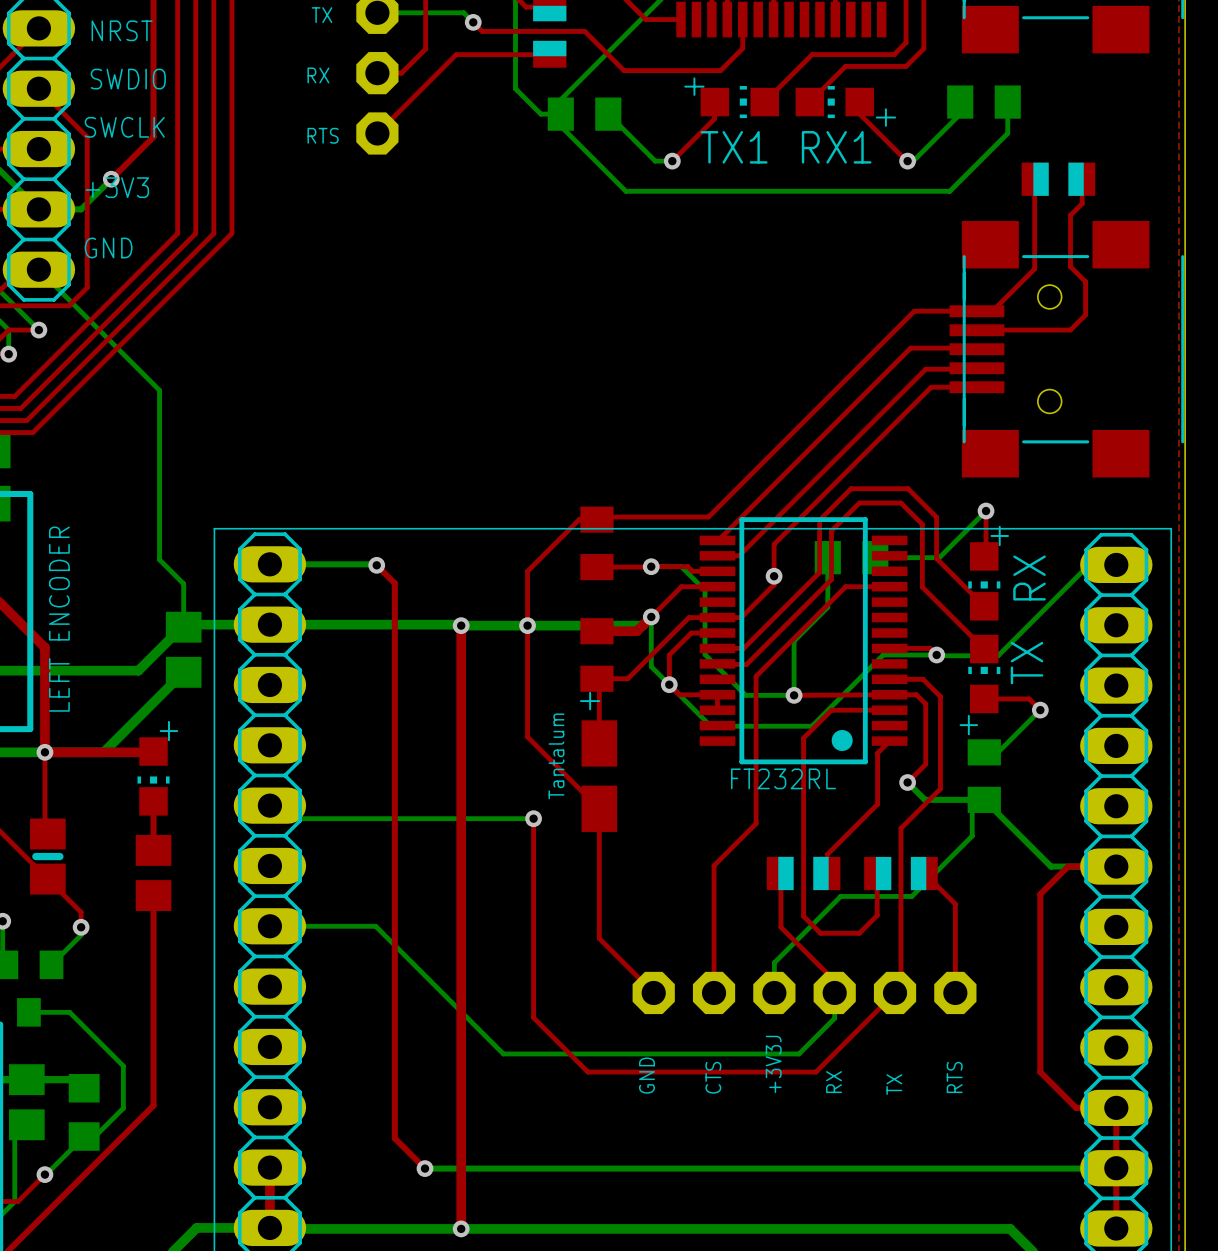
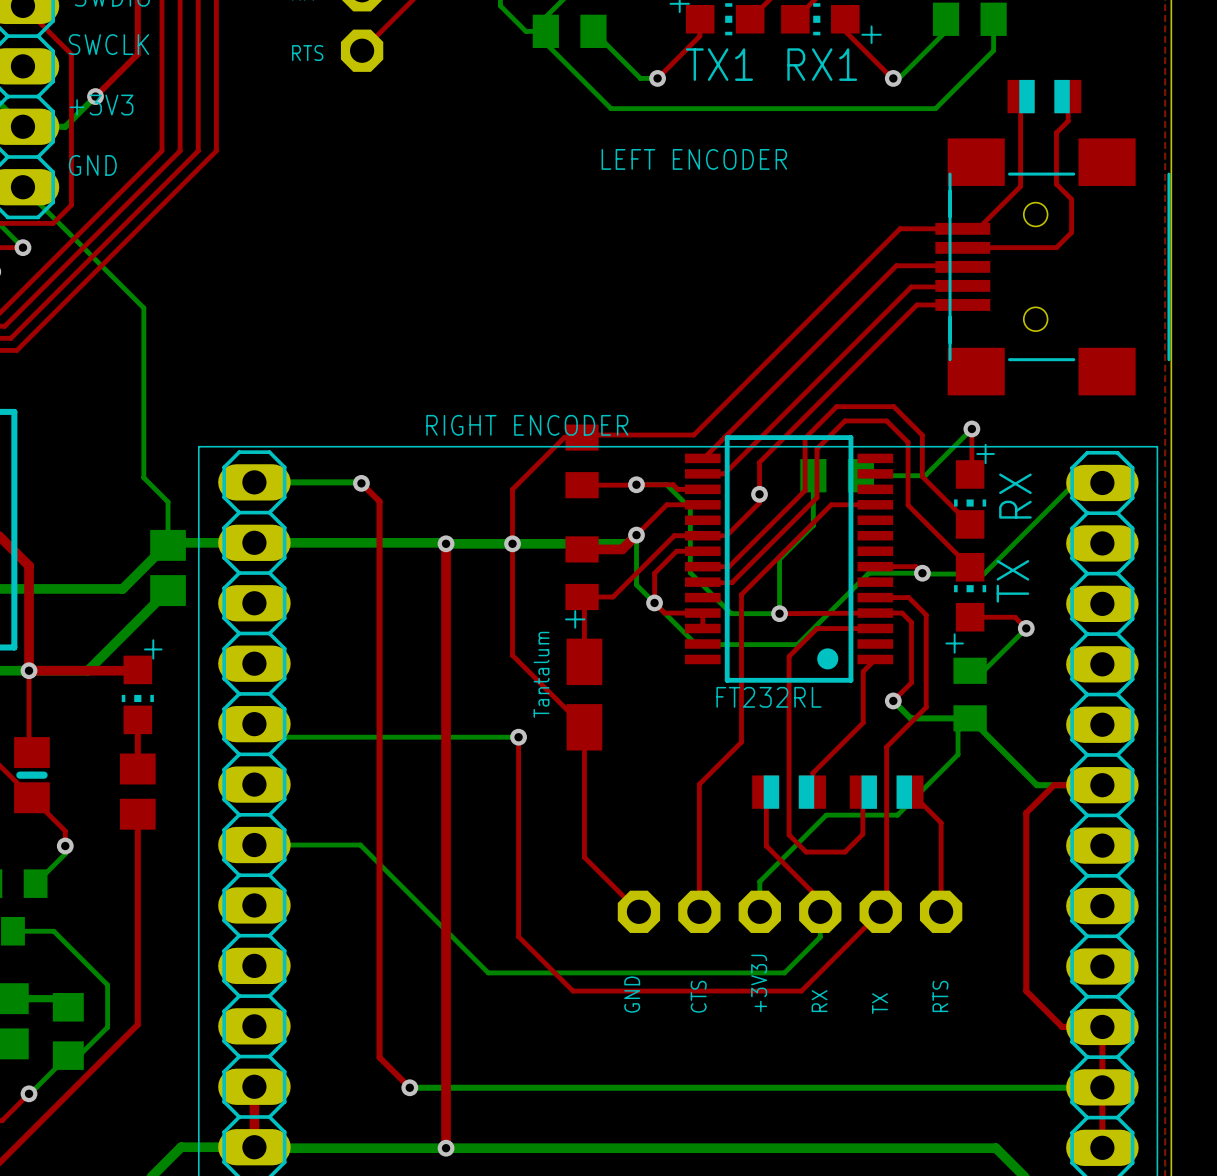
text: none -> LEFT ENCODER (694, 159)
text: none -> RIGHT ENCODER (527, 425)
text: LEFT ENCODER (59, 619) -> none

